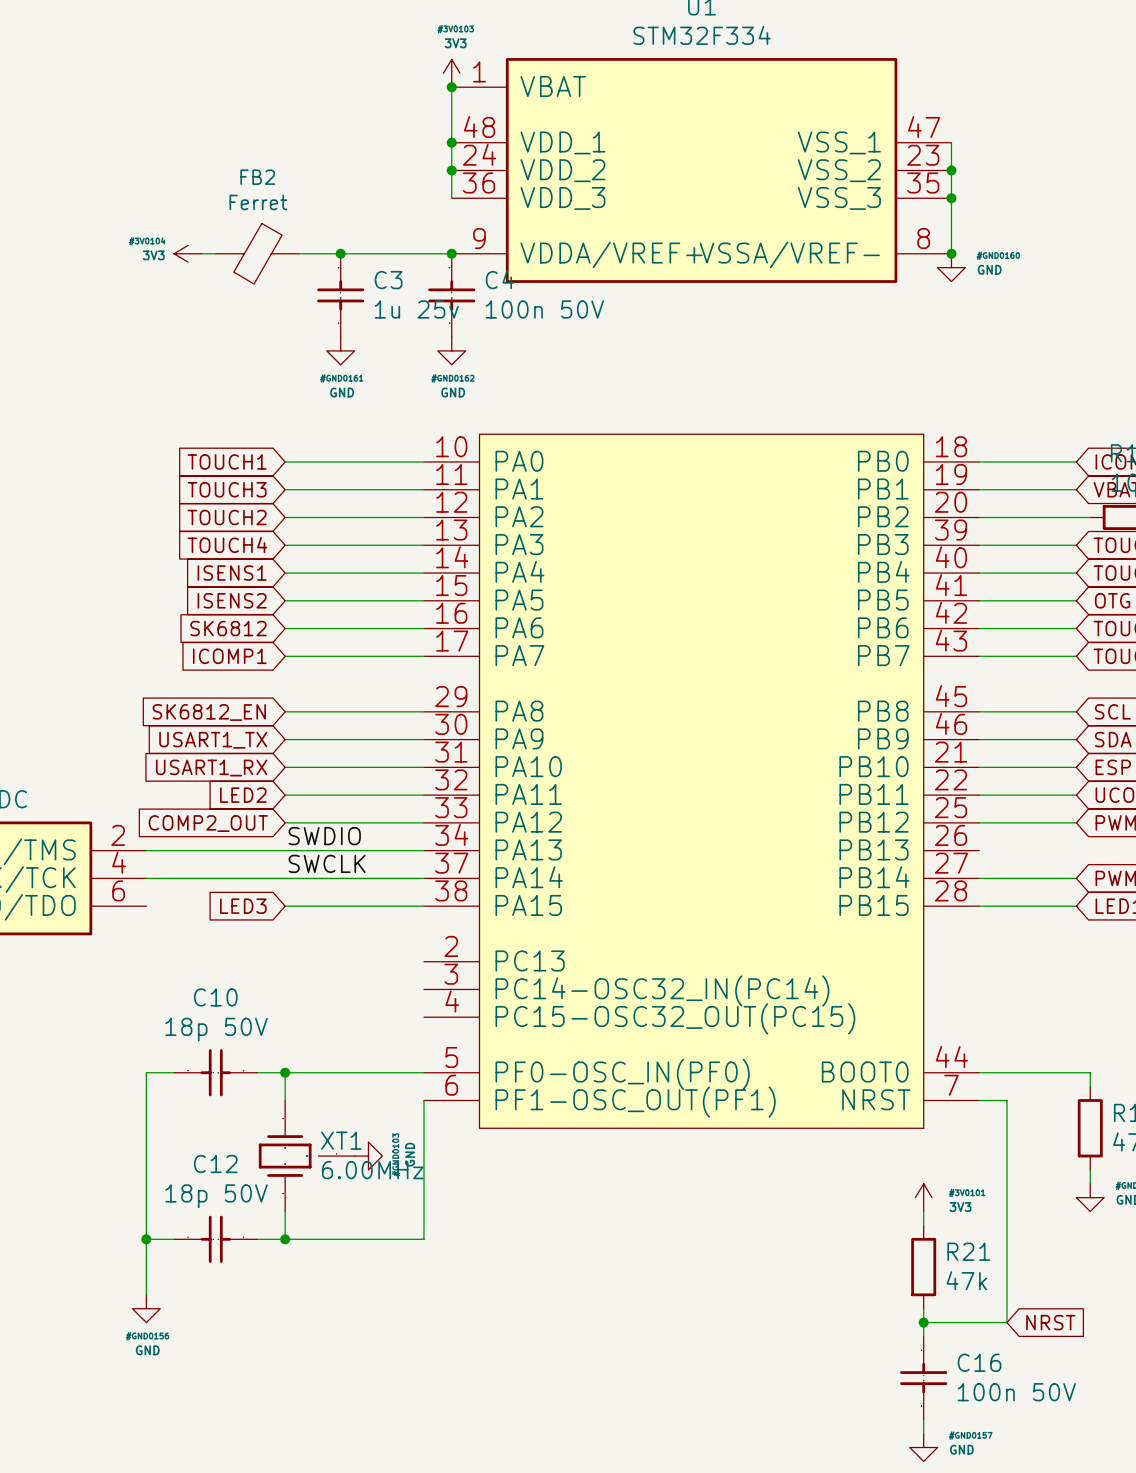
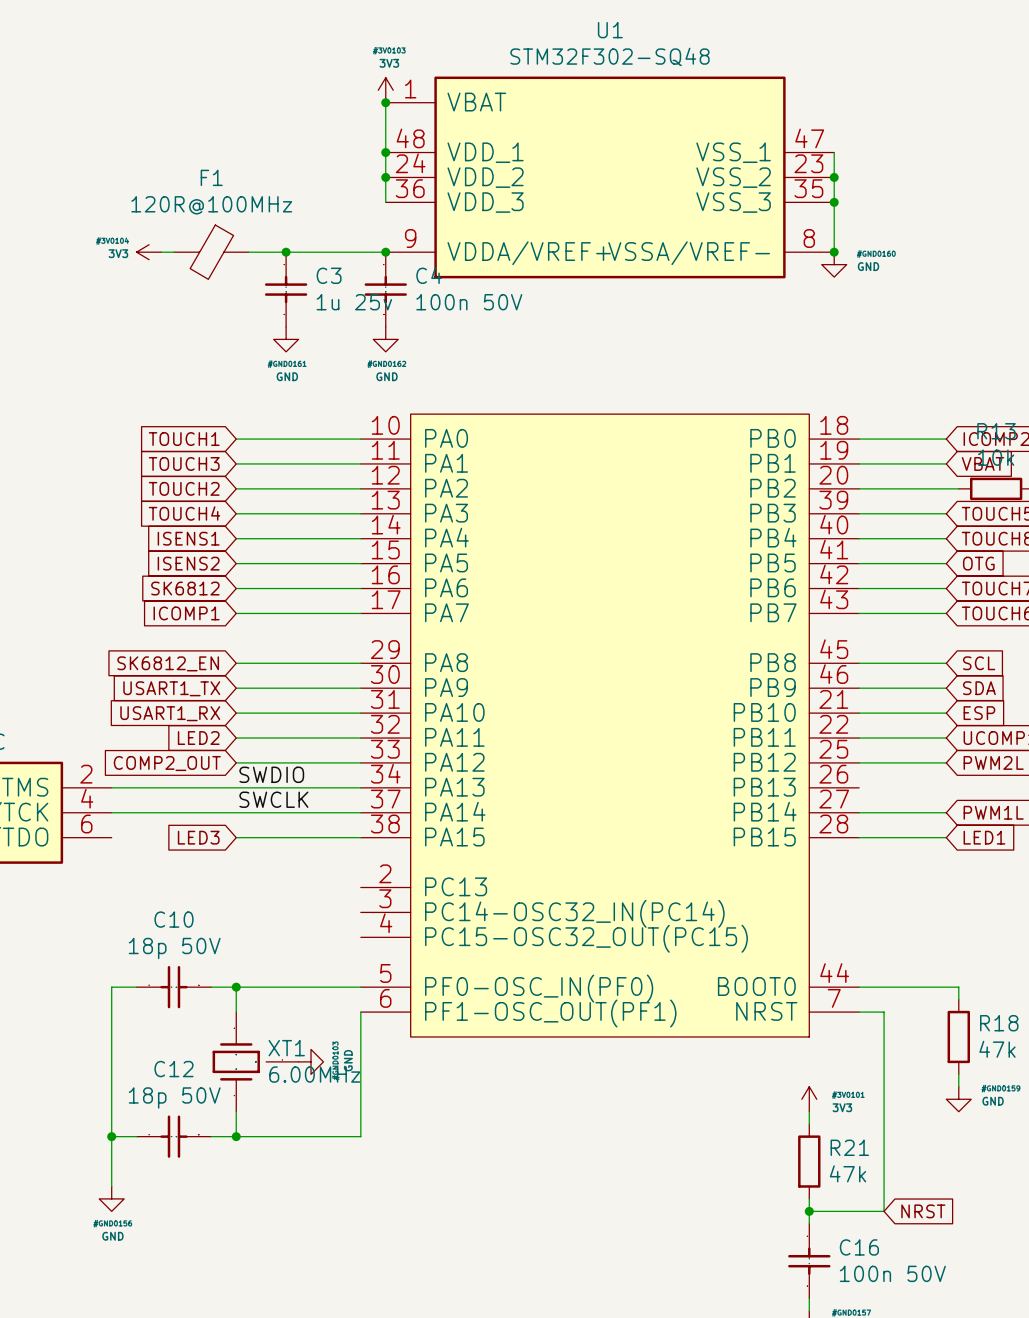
U1 value: STM32F334 (701, 35) -> STM32F302-SQ48 (609, 56)
FB2 name: FB2 (257, 177) -> F1 (211, 177)
FB2 value: Ferret (258, 202) -> 120R@100MHz (211, 205)

